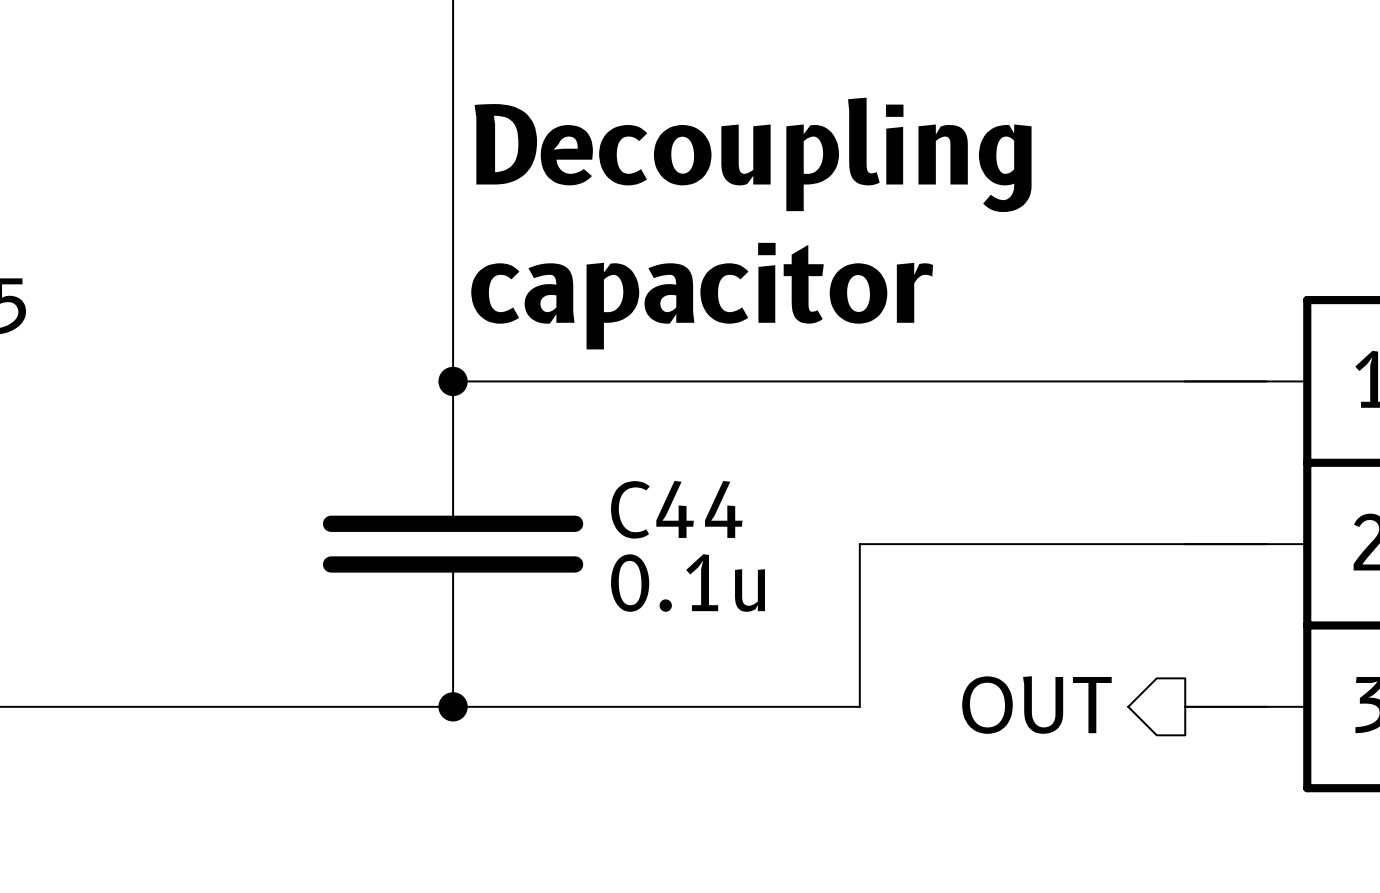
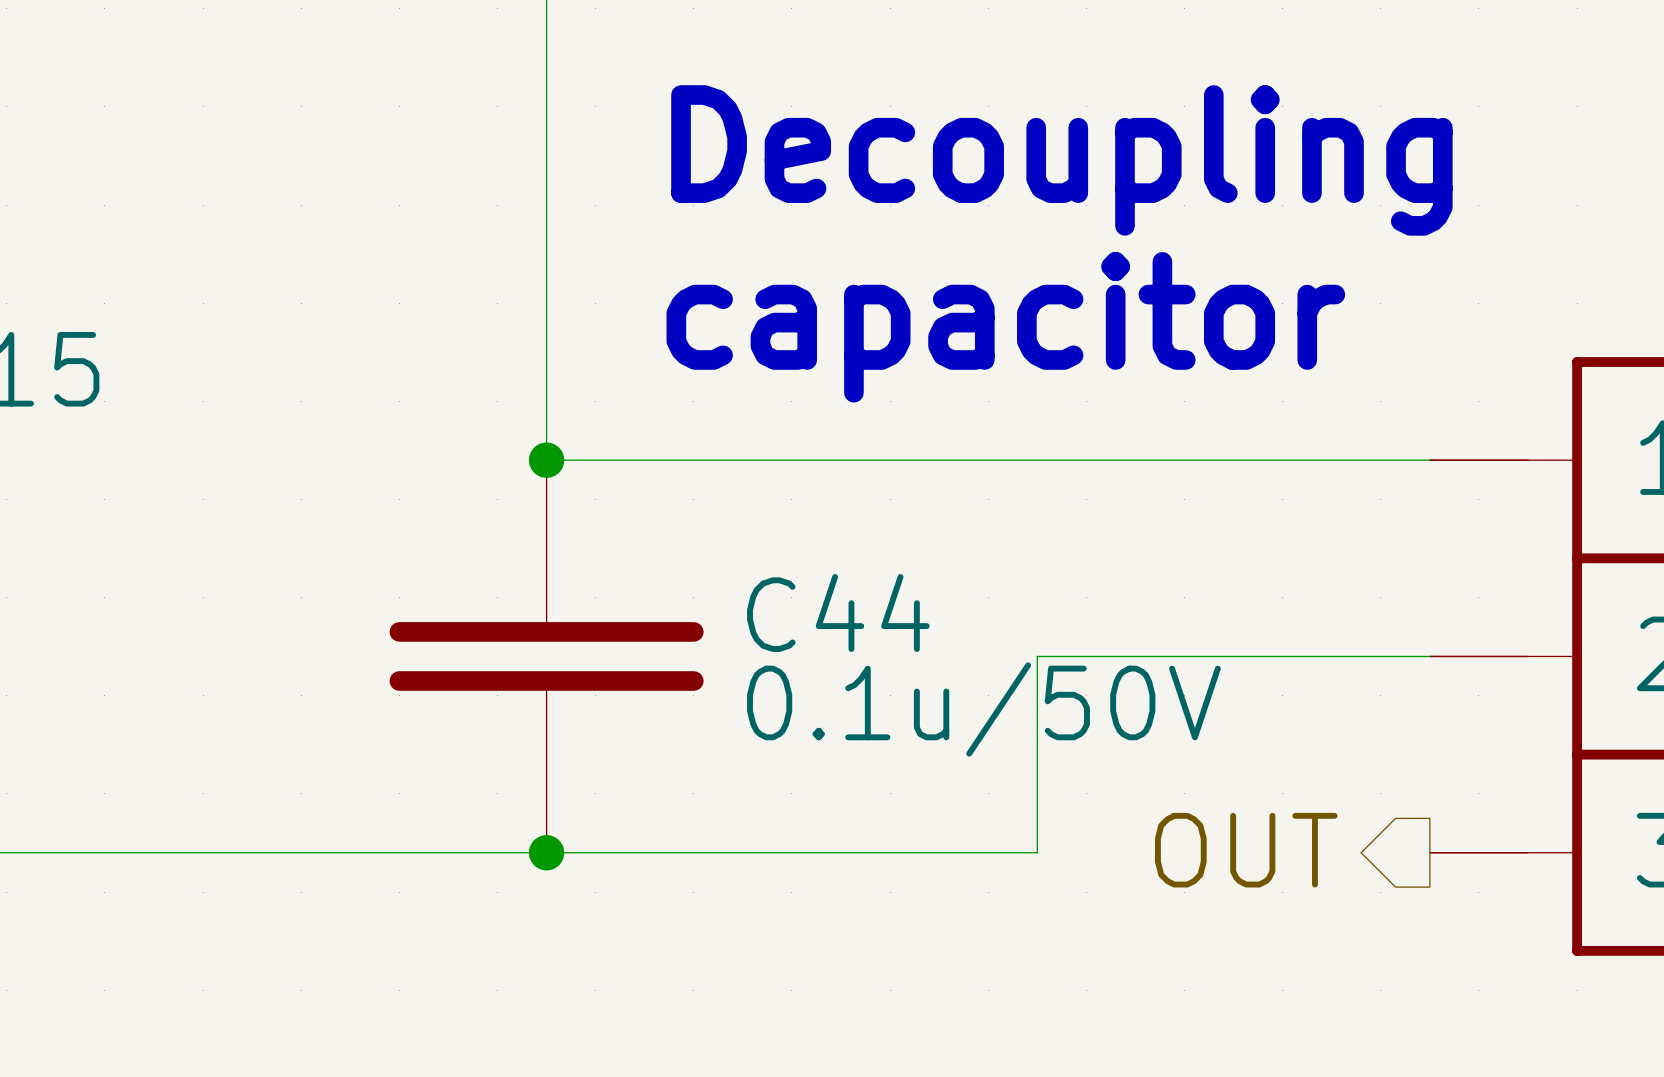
text position: Decoupling (753, 154) -> Decoupling (1061, 160)
text position: capacitor (702, 296) -> capacitor (1005, 327)
C44 value: 0.1u (688, 583) -> 0.1u/50V (983, 709)

